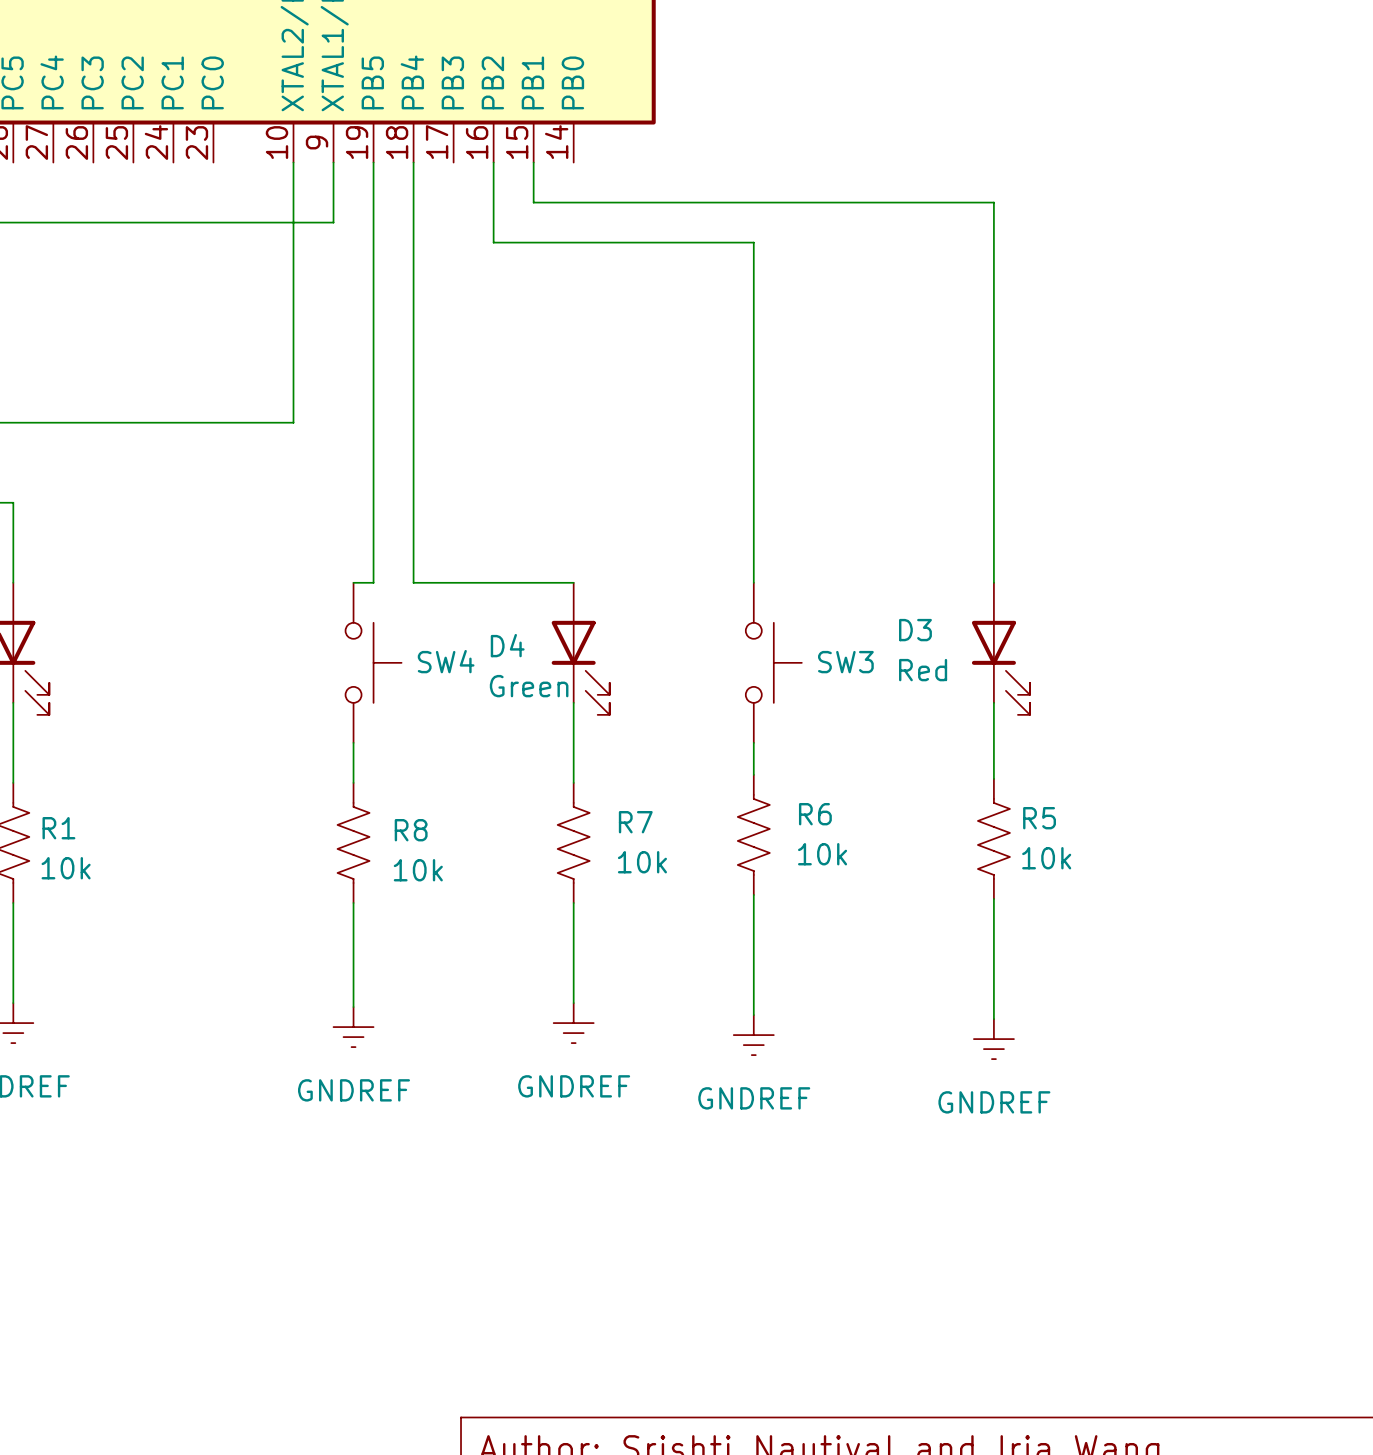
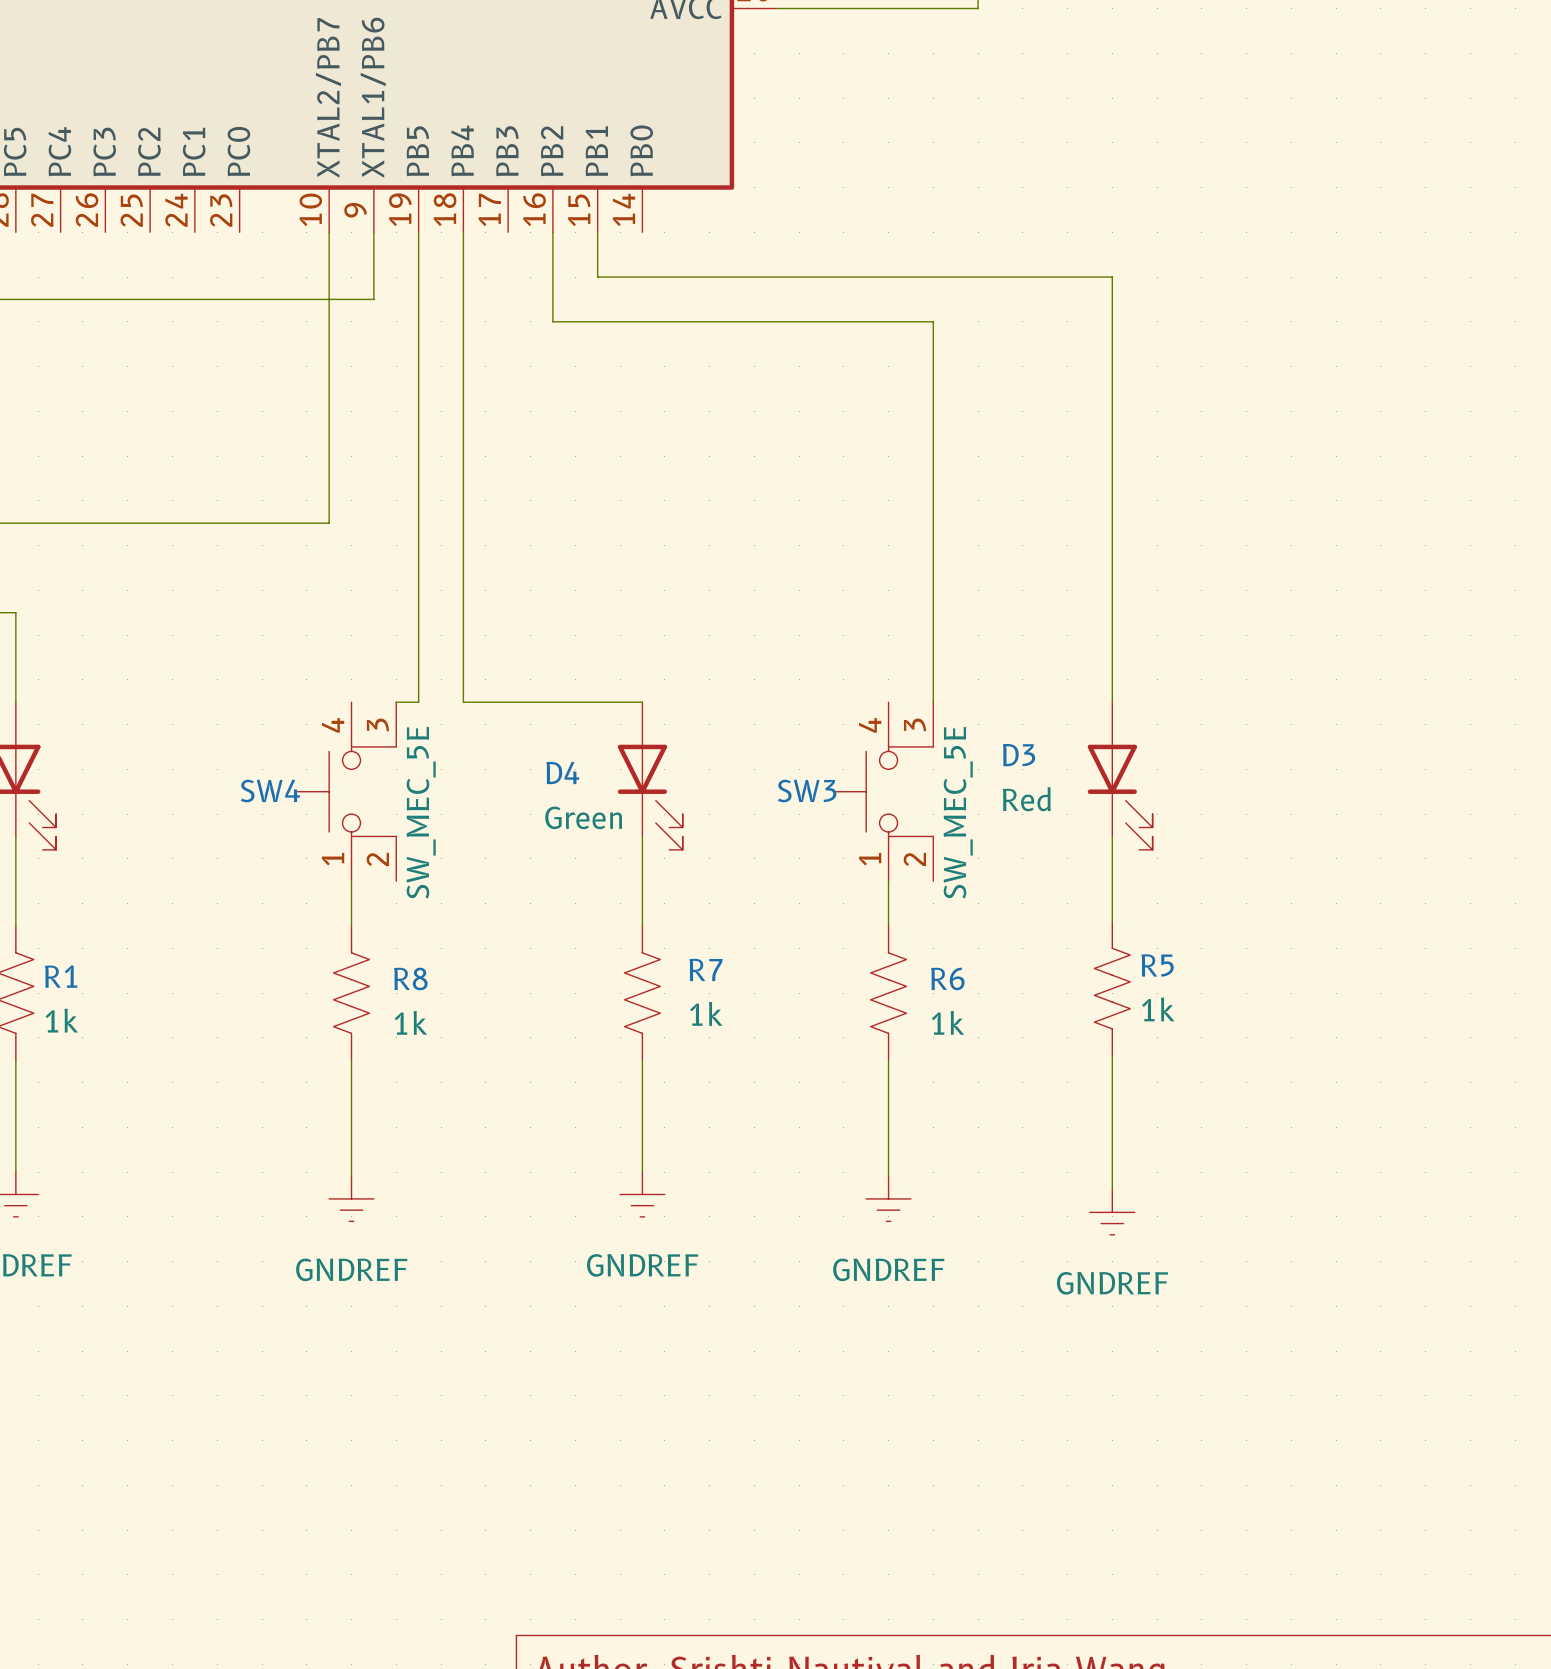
wire: (753, 242) (753, 582) -> (843, 321) (933, 321) (933, 702)
SW4 symbol: [345, 582, 402, 743] -> [297, 702, 397, 882]
SW3 symbol: [745, 582, 802, 743] -> [834, 702, 934, 882]
SW4 name position: SW4 (446, 661) -> SW4 (270, 790)
SW3 name position: SW3 (845, 662) -> SW3 (807, 790)
SW4 value: none -> SW_MEC_5E (421, 812)
SW3 value: none -> SW_MEC_5E (958, 812)
wire: (353, 742) (353, 782) -> (351, 881) (351, 925)
wire: (753, 742) (753, 774) -> none
wire: none -> (888, 881) (888, 925)
R6 name position: R6 (815, 814) -> R6 (947, 978)
R6 position: (753, 834) -> (888, 993)
R8 position: (353, 842) -> (351, 993)
R6 value: 10k (822, 854) -> 1k (947, 1022)
R5 value: 10k (1046, 858) -> 1k (1158, 1009)
R7 value: 10k (642, 862) -> 1k (706, 1013)
R1 value: 10k (66, 868) -> 1k (61, 1020)
R8 value: 10k (418, 870) -> 1k (410, 1022)
wire: (753, 894) (753, 1015) -> none
wire: (353, 903) (353, 1007) -> (351, 1060) (351, 1176)
wire: none -> (888, 1060) (888, 1176)
power symbol position: GNDREF (353, 1027) -> GNDREF (351, 1198)
power symbol position: GNDREF (753, 1035) -> GNDREF (888, 1198)

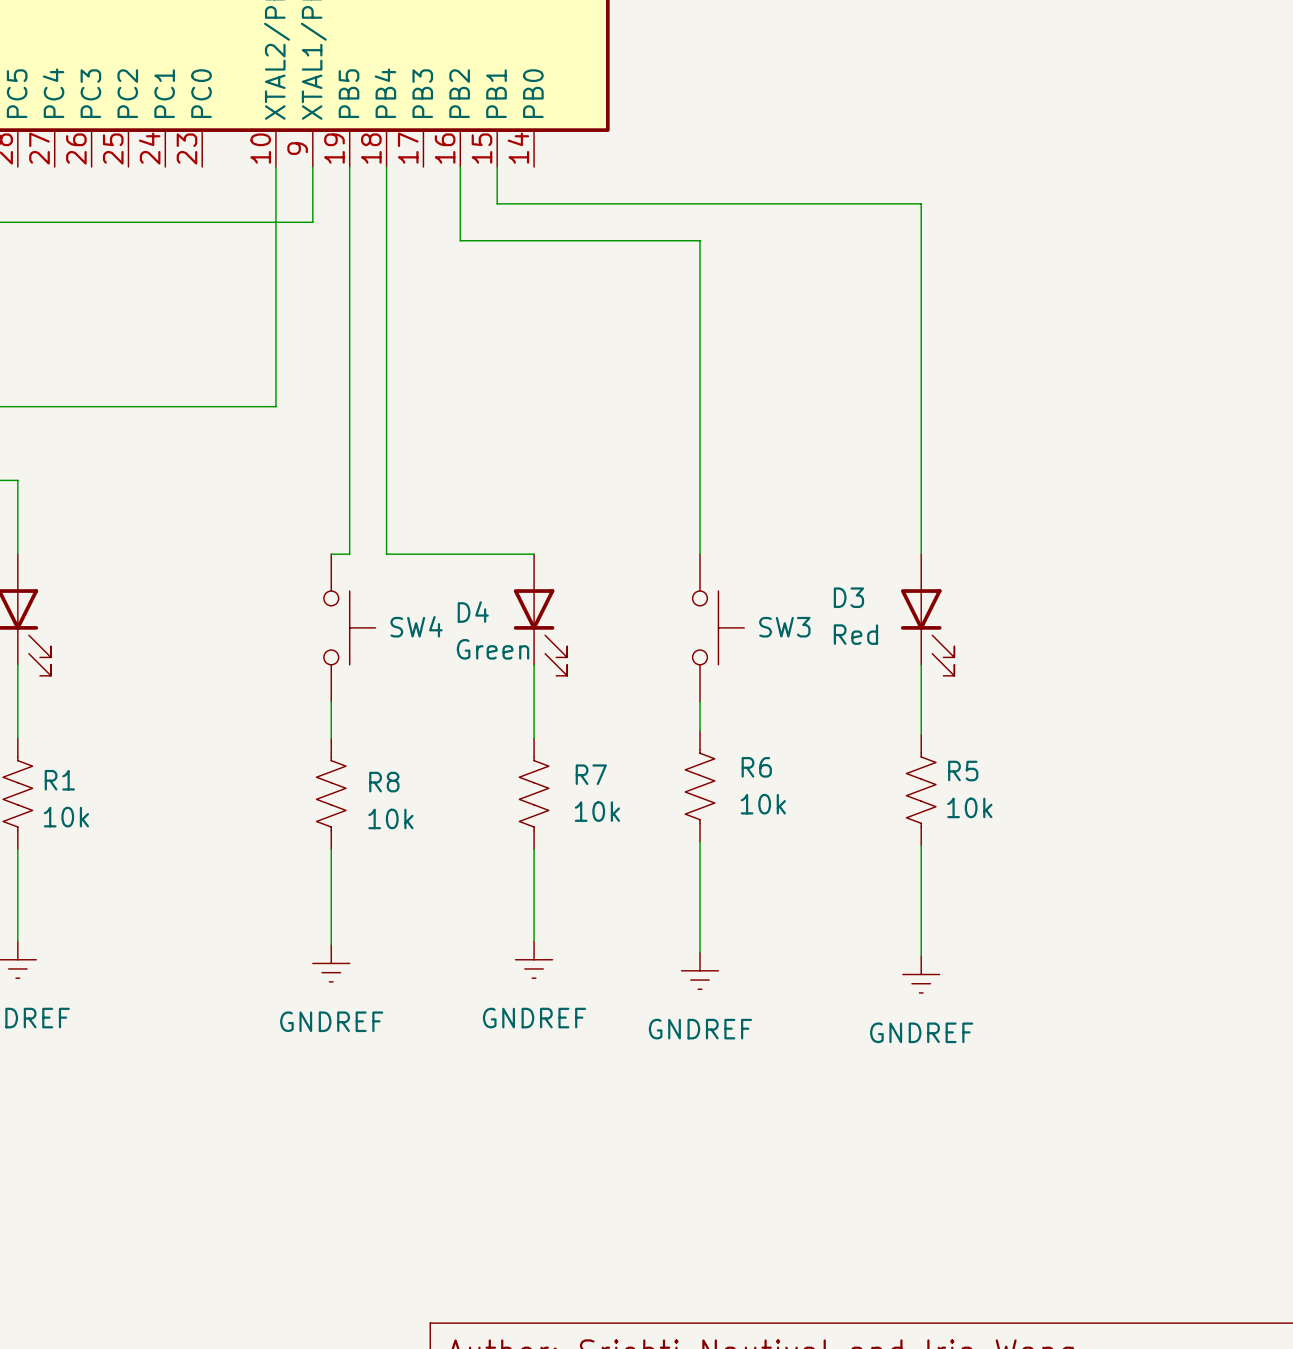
wire: (843, 321) (933, 321) (933, 702) -> (699, 240) (699, 554)
SW4 symbol: [297, 702, 397, 882] -> [323, 554, 376, 702]
SW3 symbol: [834, 702, 934, 882] -> [692, 554, 745, 702]
SW4 name position: SW4 (270, 790) -> SW4 (416, 626)
SW3 name position: SW3 (807, 790) -> SW3 (784, 627)
SW4 value: SW_MEC_5E (421, 812) -> none
SW3 value: SW_MEC_5E (958, 812) -> none
wire: (351, 881) (351, 925) -> (331, 701) (331, 738)
wire: none -> (699, 701) (699, 731)
wire: (888, 881) (888, 925) -> none
R6 name position: R6 (947, 978) -> R6 (756, 767)
R8 position: (351, 993) -> (331, 793)
R6 position: (888, 993) -> (699, 786)
R5 value: 1k (1158, 1009) -> 10k (969, 807)
R7 value: 1k (706, 1013) -> 10k (597, 811)
R1 value: 1k (61, 1020) -> 10k (66, 817)
R8 value: 1k (410, 1022) -> 10k (390, 818)
R6 value: 1k (947, 1022) -> 10k (763, 804)
wire: none -> (699, 841) (699, 952)
wire: (351, 1060) (351, 1176) -> (331, 849) (331, 945)
wire: (888, 1060) (888, 1176) -> none
power symbol position: GNDREF (351, 1198) -> GNDREF (331, 963)
power symbol position: GNDREF (888, 1198) -> GNDREF (699, 970)

